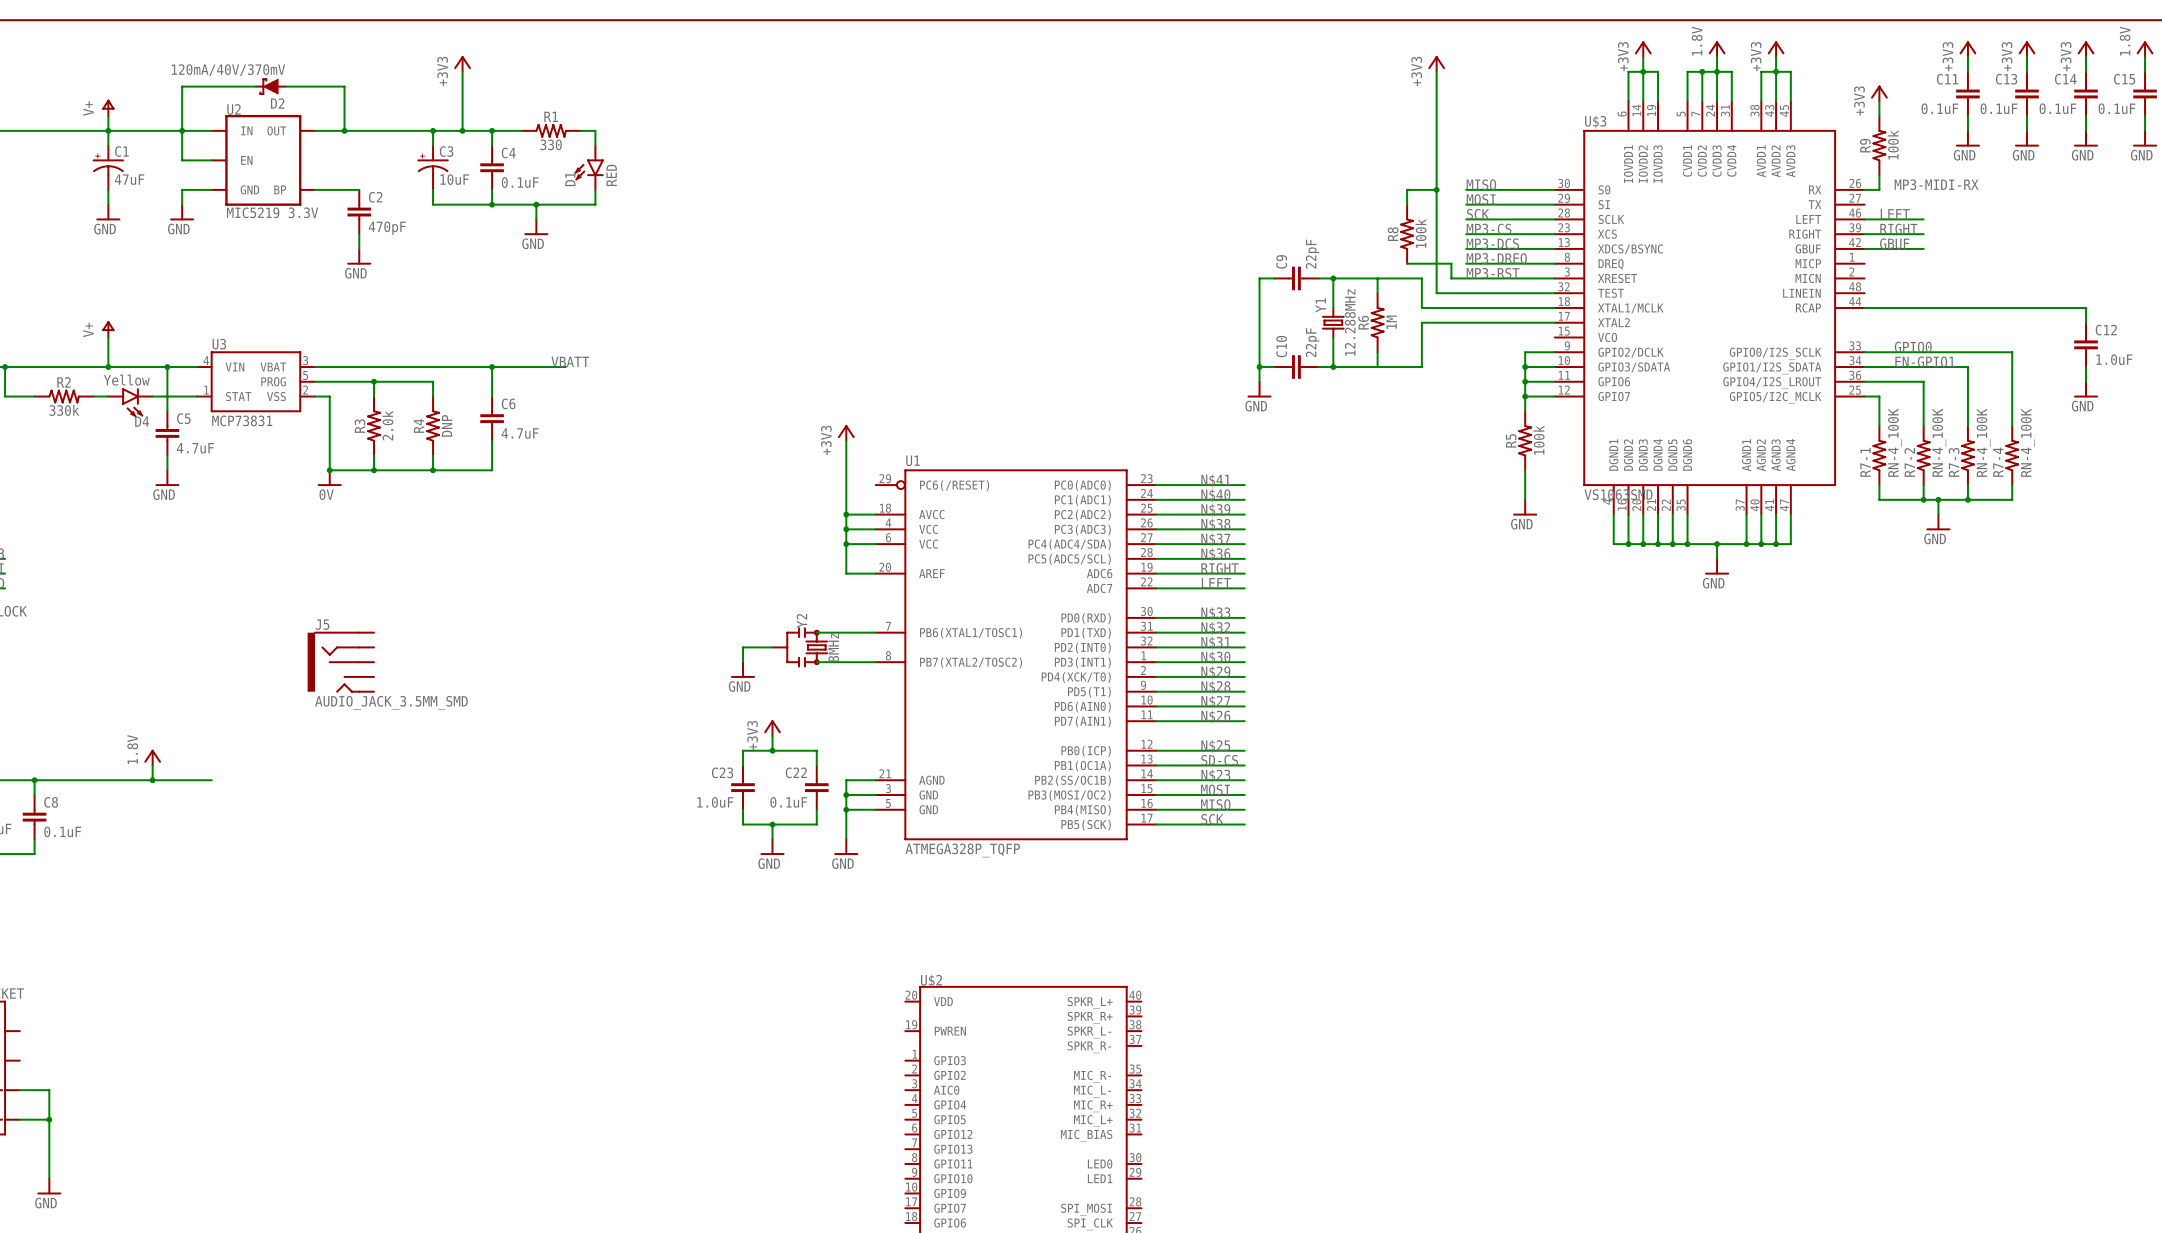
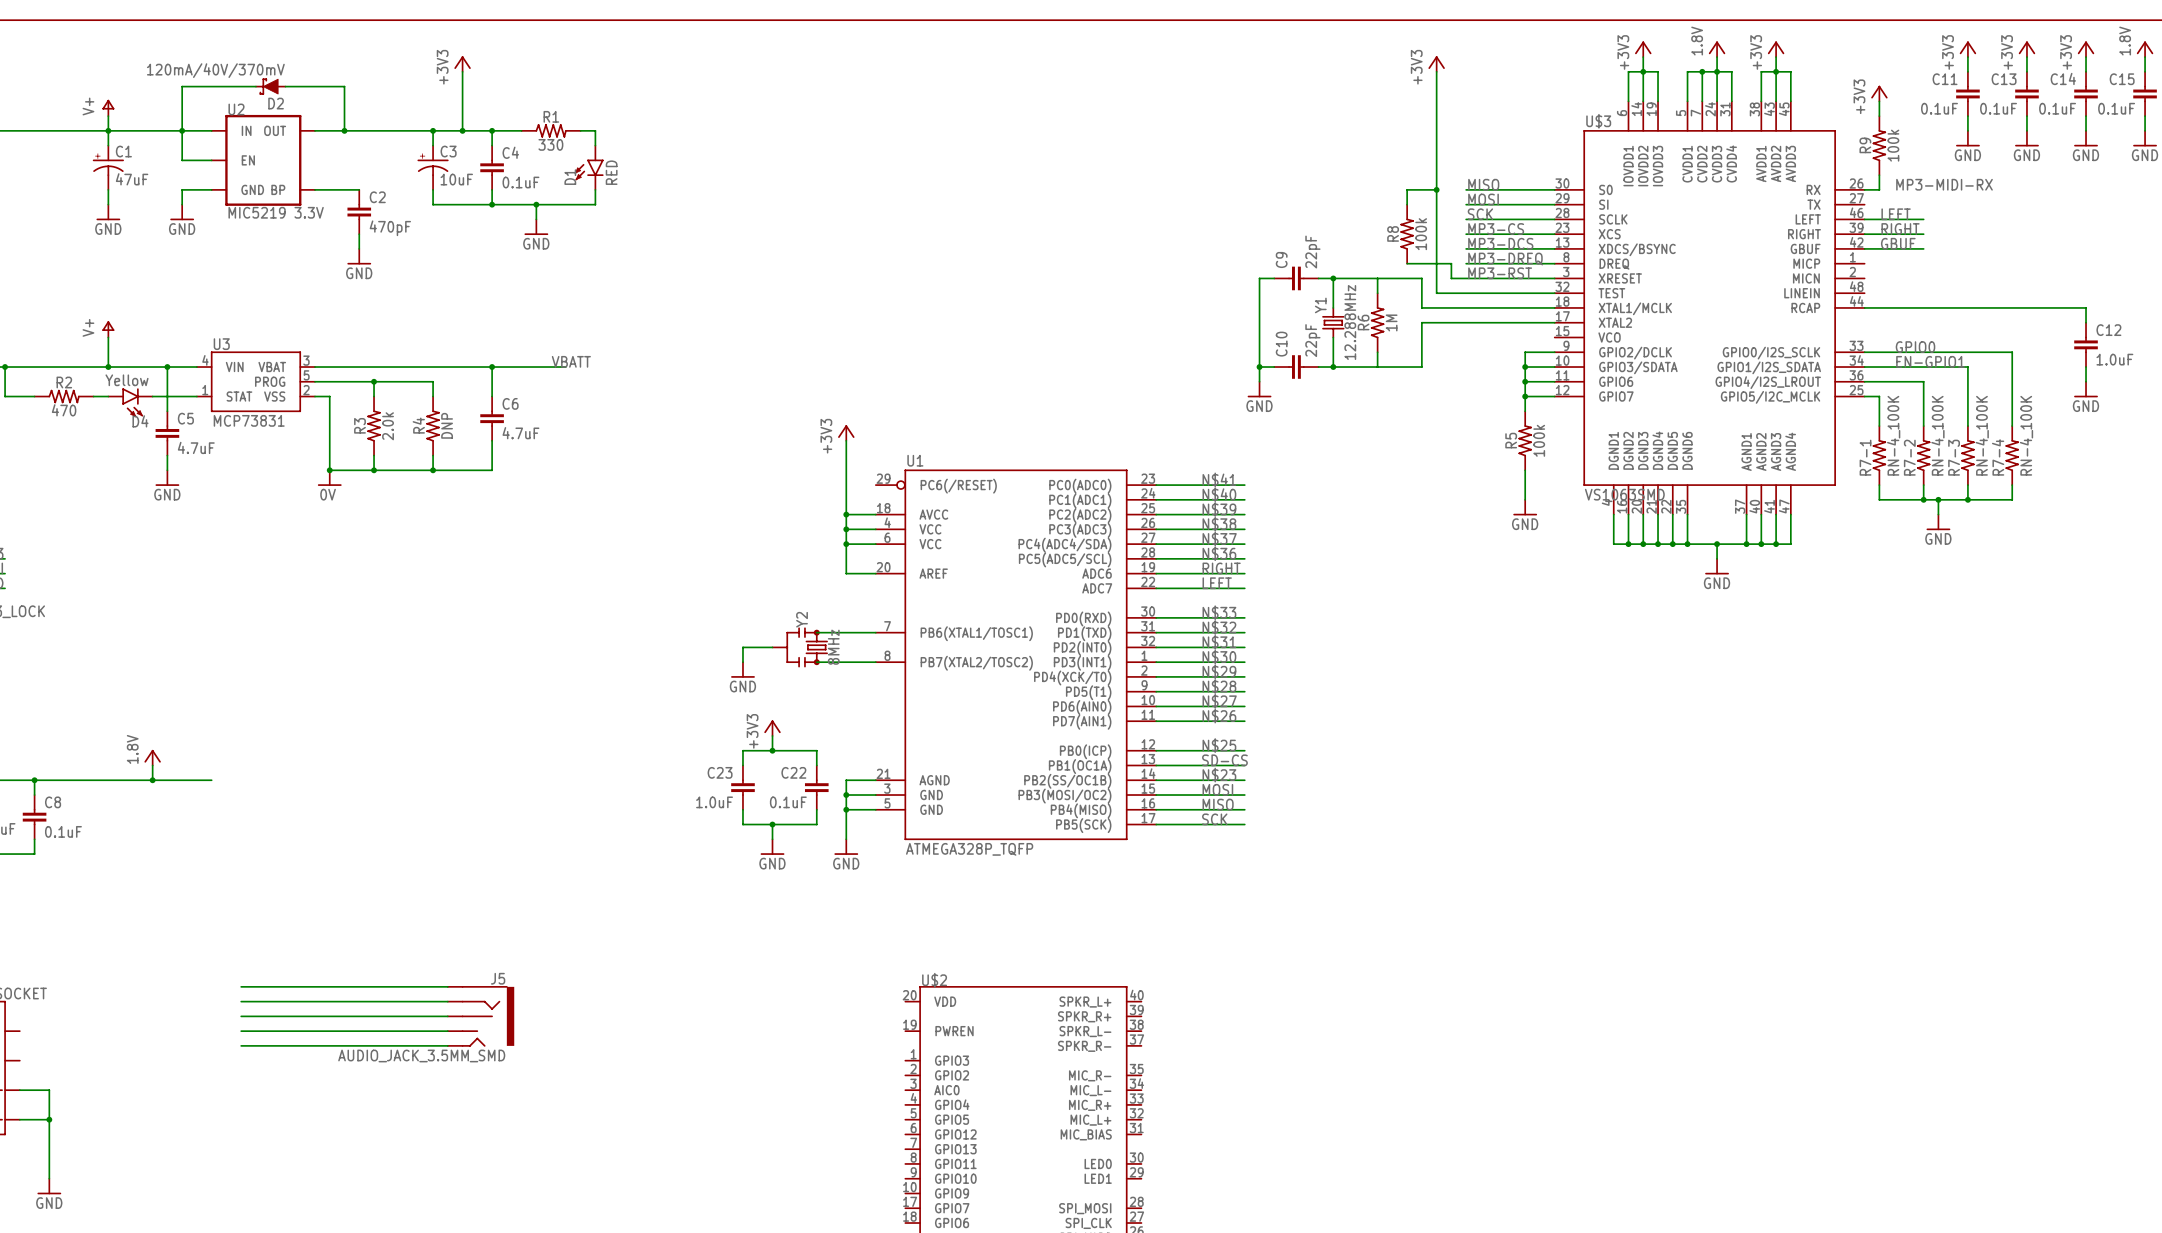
R2 value: 330k (64, 410) -> 470 (64, 410)
J5 flip: as is (333, 662) -> left-right (488, 1016)
J5 position: (340, 662) -> (481, 1016)
wire: none -> (241, 986) (447, 986)
wire: none -> (241, 1001) (447, 1001)
wire: none -> (241, 1016) (447, 1016)
wire: none -> (241, 1031) (447, 1031)
wire: none -> (241, 1045) (447, 1045)

